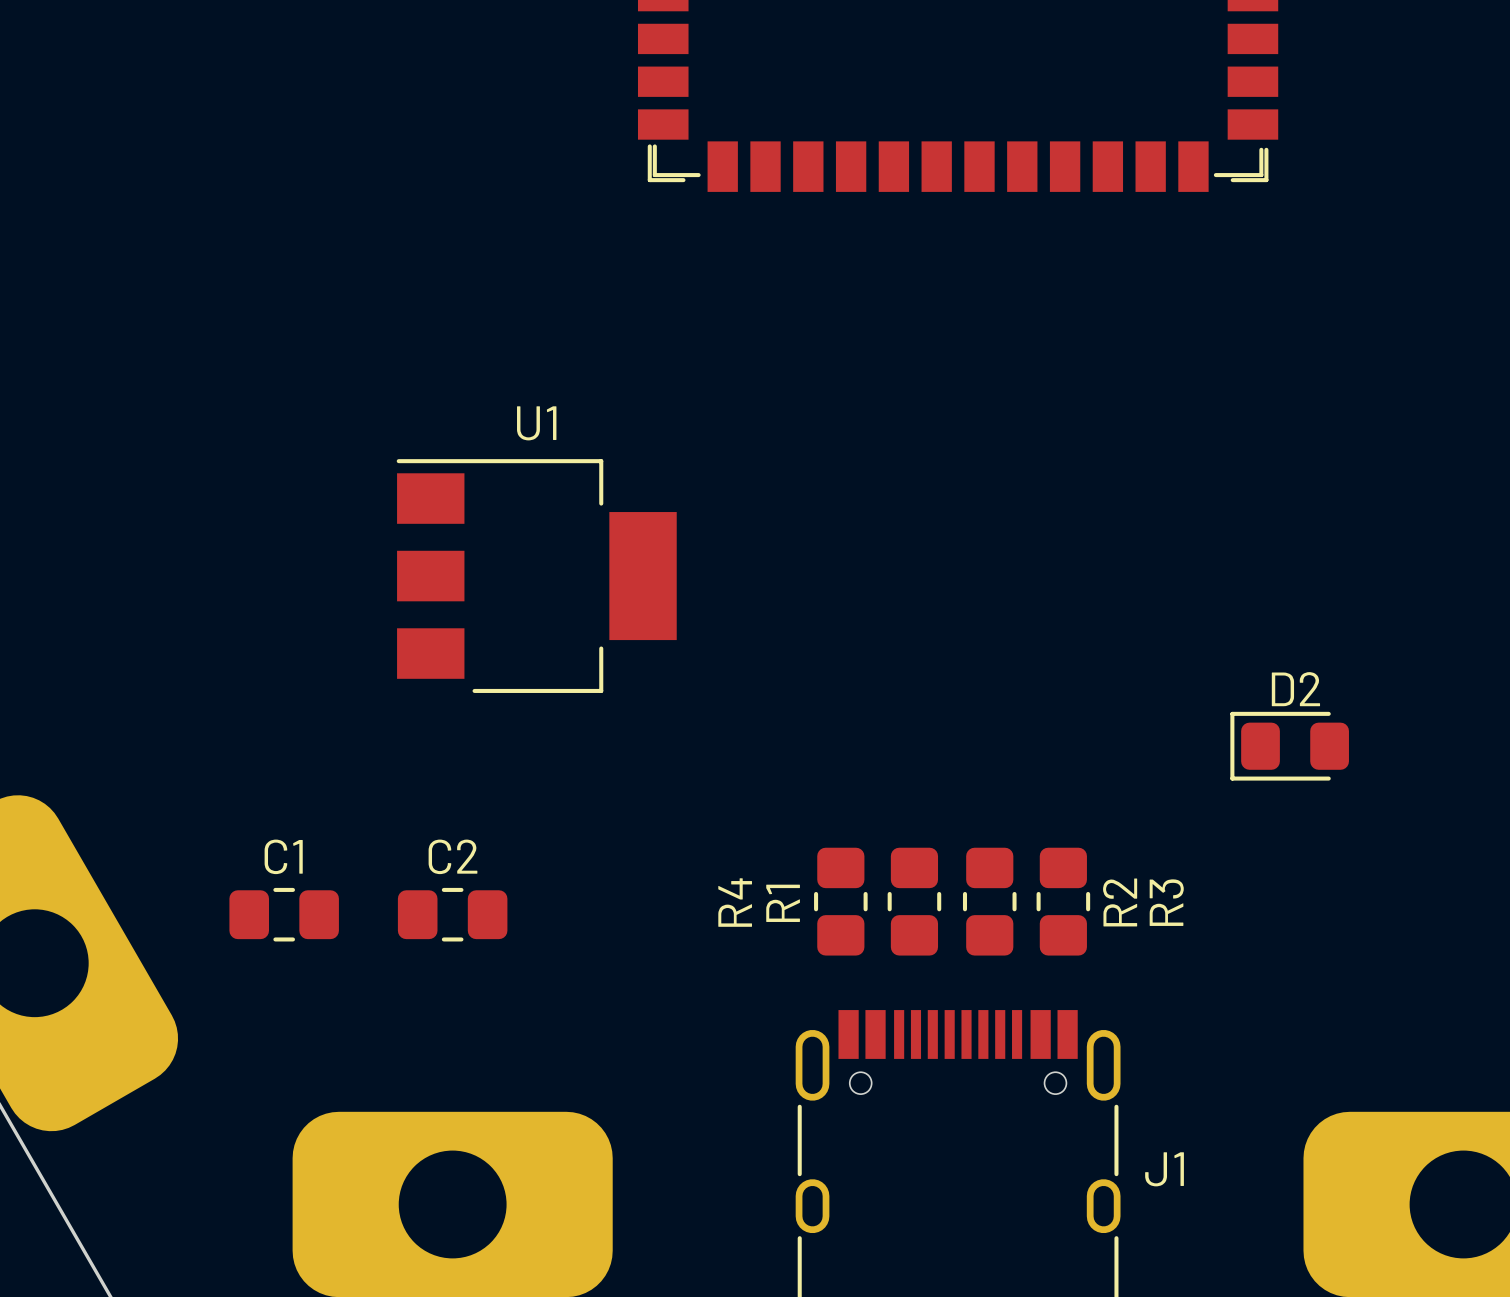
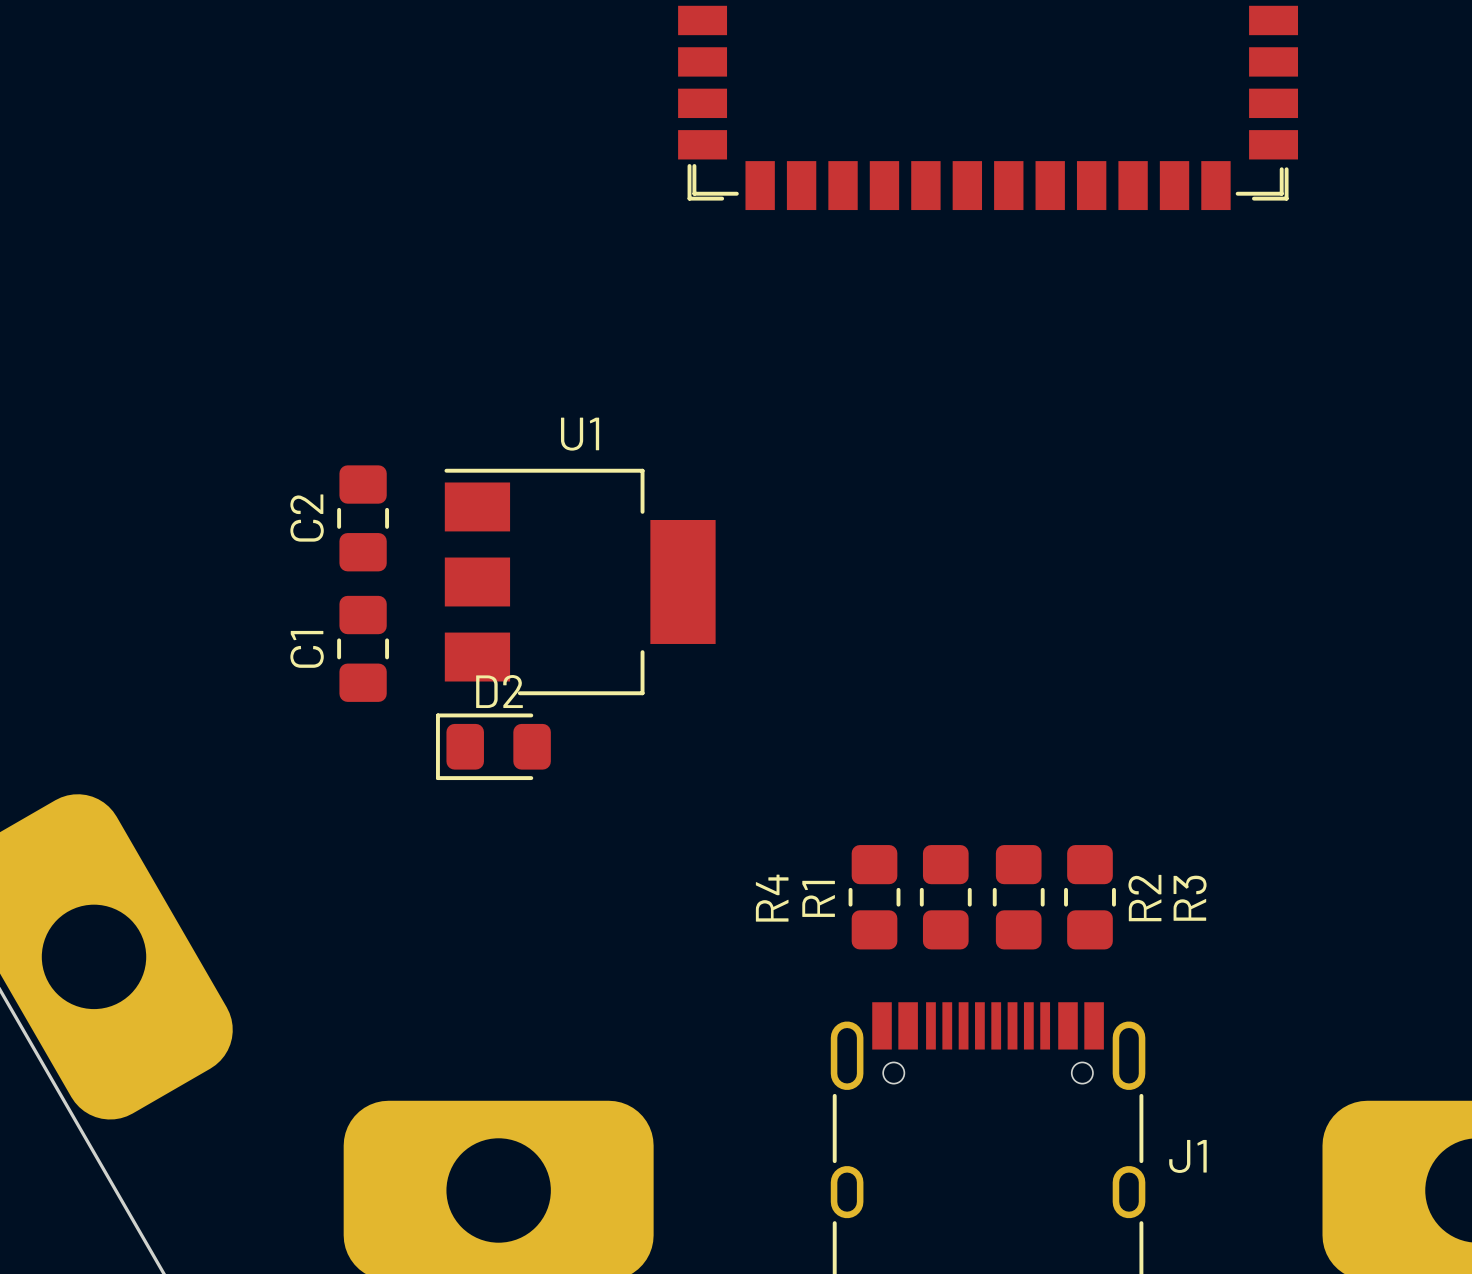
D2 position: (1289, 746) -> (493, 746)
C1 name position: C1 (283, 856) -> C1 (307, 649)
C2 name position: C2 (452, 856) -> C2 (307, 518)
C1 rotation: 0° (284, 914) -> 90° clockwise (363, 648)
C1 position: (284, 914) -> (363, 648)
C2 rotation: 0° (452, 914) -> 90° clockwise (363, 518)
C2 position: (452, 914) -> (363, 518)

